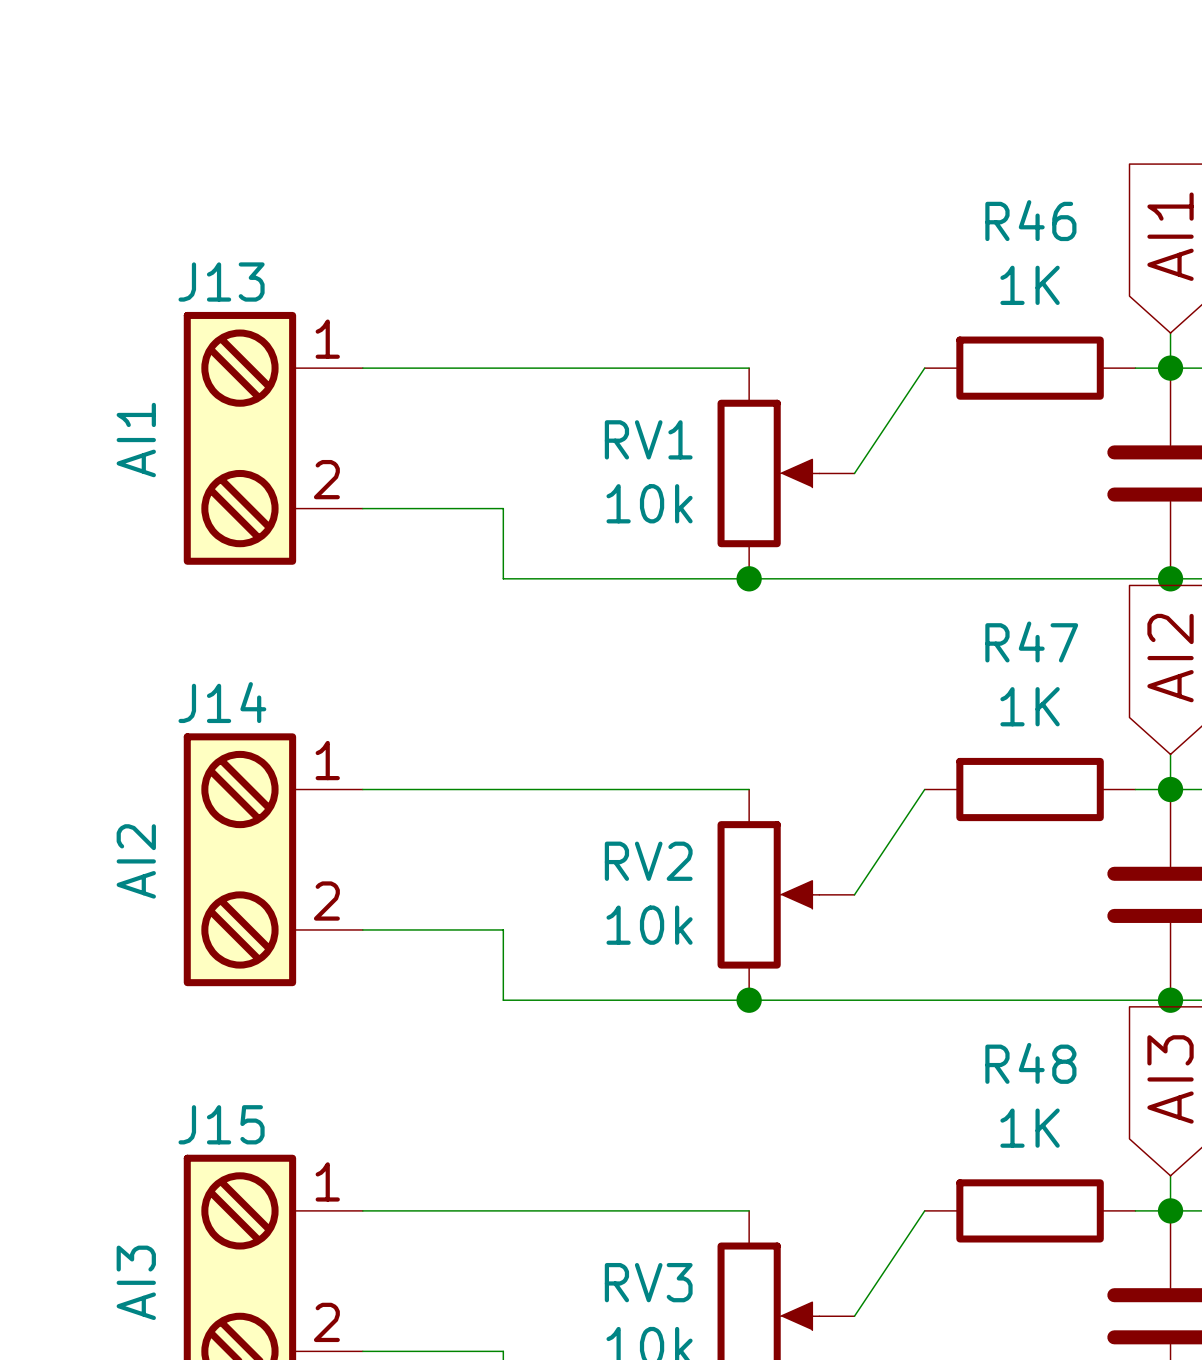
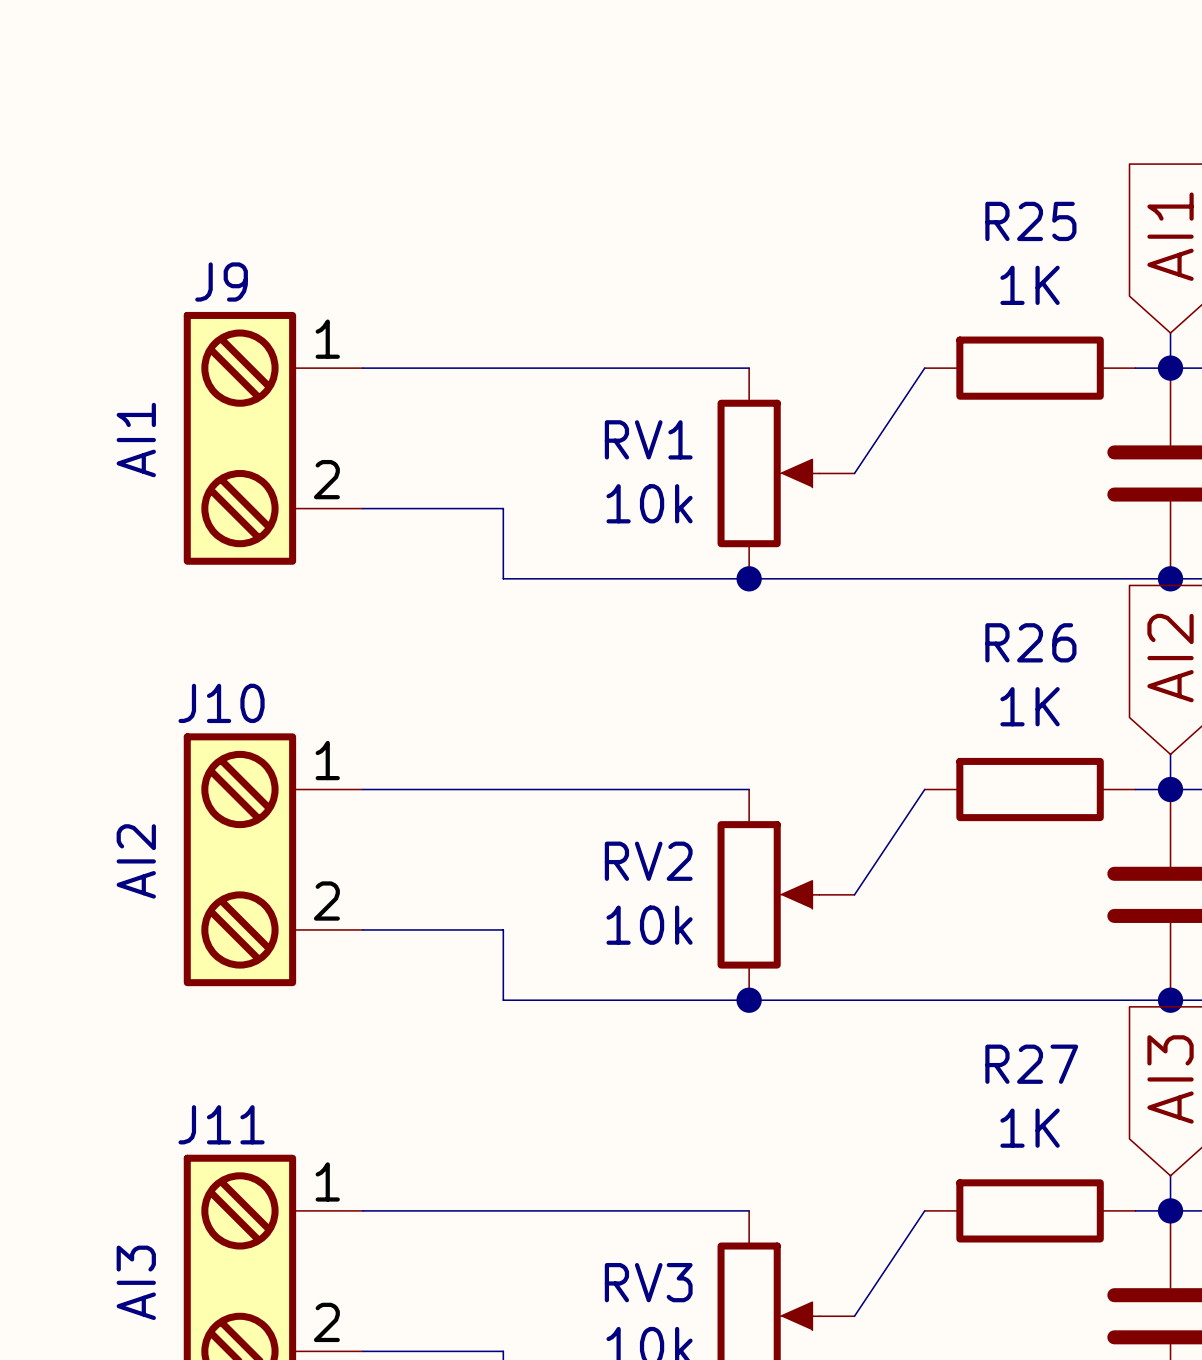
R46 name: R46 (1030, 220) -> R25 (1030, 221)
J13 name: J13 (221, 282) -> J9 (221, 282)
R47 name: R47 (1031, 641) -> R26 (1030, 642)
J14 name: J14 (222, 702) -> J10 (221, 703)
R48 name: R48 (1030, 1063) -> R27 (1031, 1064)
J15 name: J15 (221, 1124) -> J11 (221, 1124)

